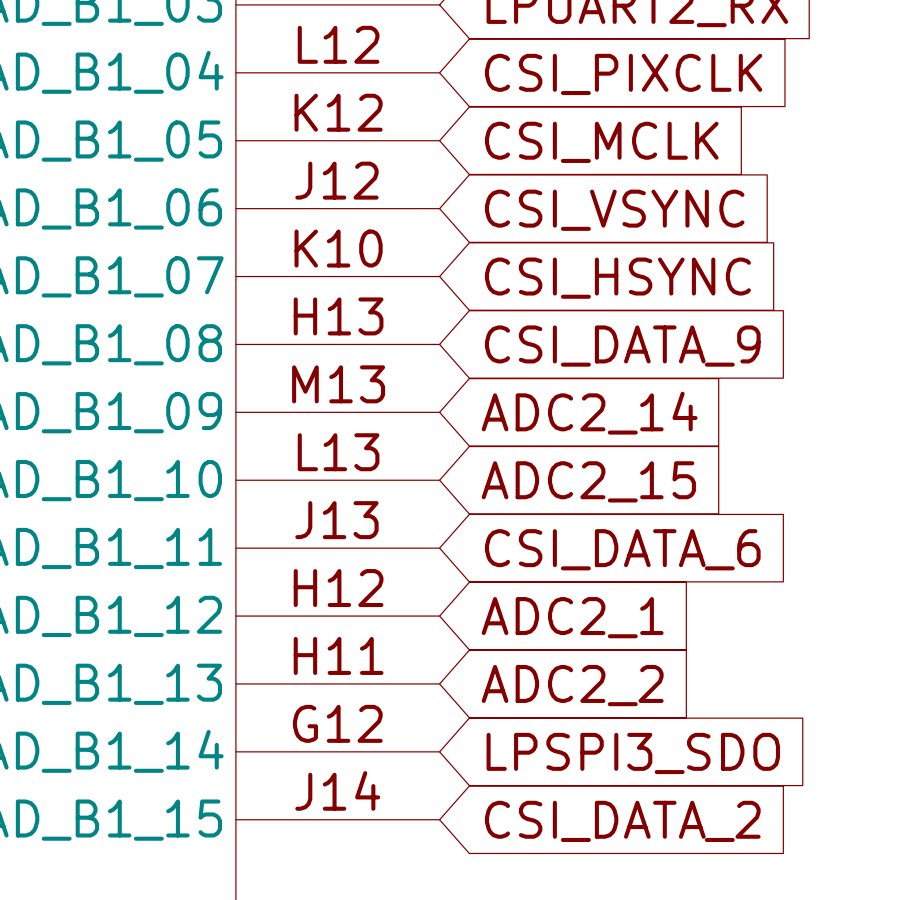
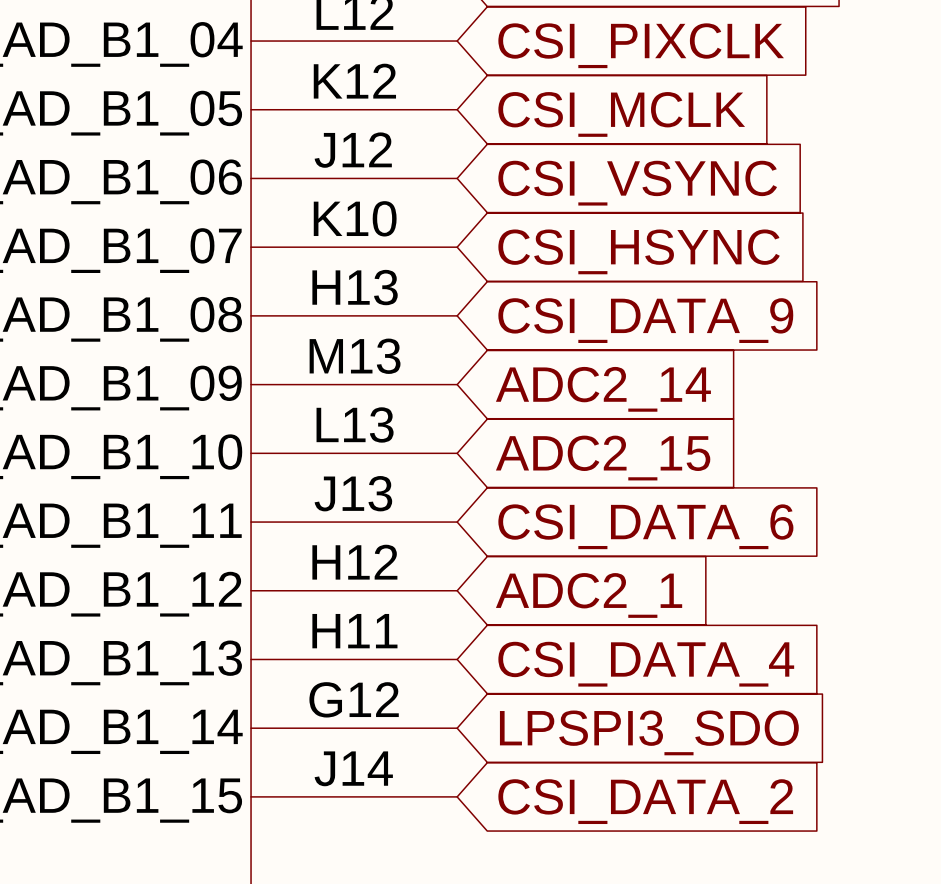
global label: ADC2_2 (572, 685) -> CSI_DATA_4 (646, 664)

